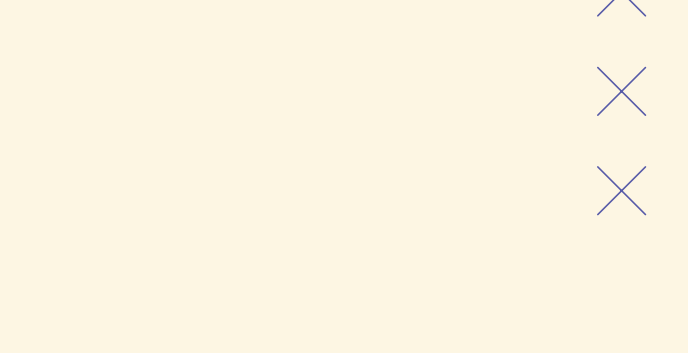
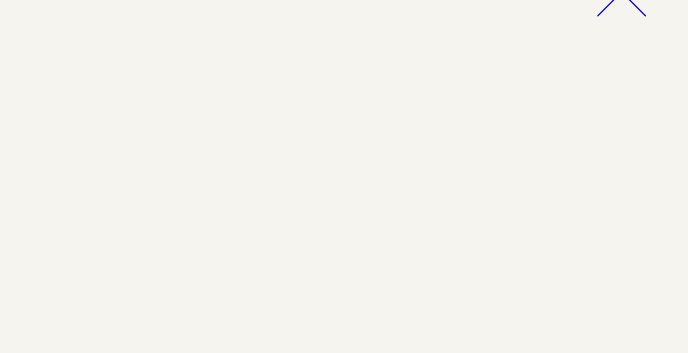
no-connect mark: (621, 91) -> none
no-connect mark: (621, 190) -> none

